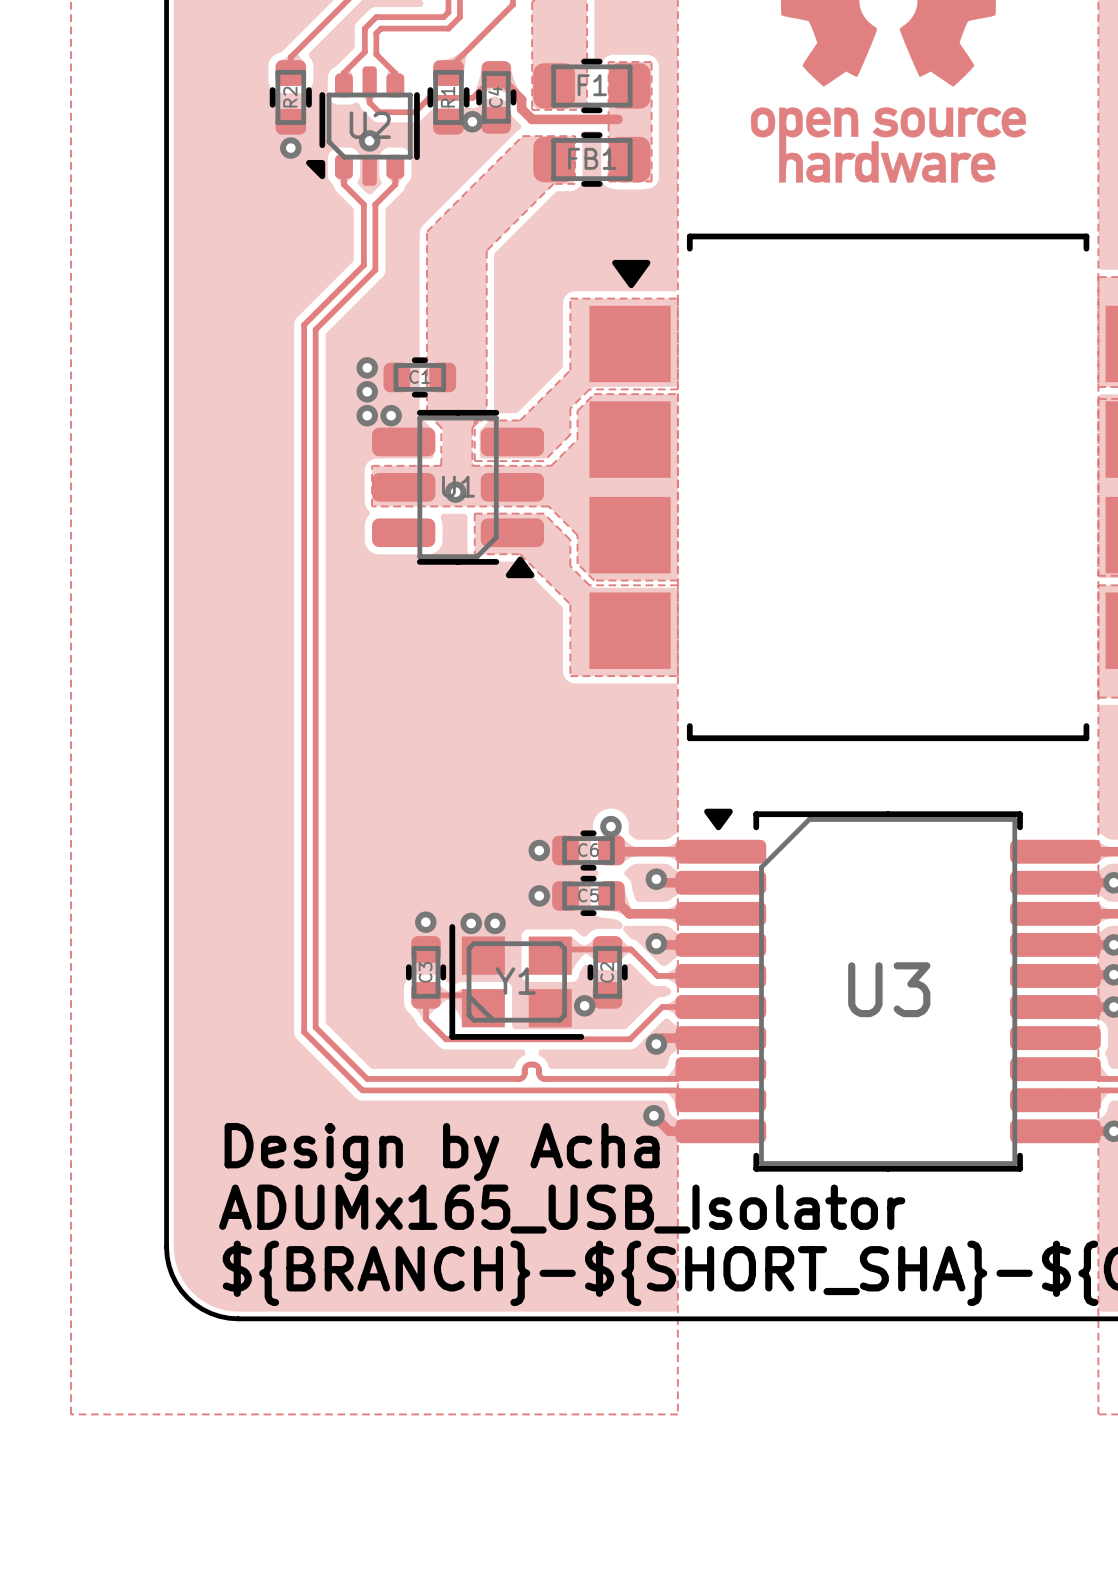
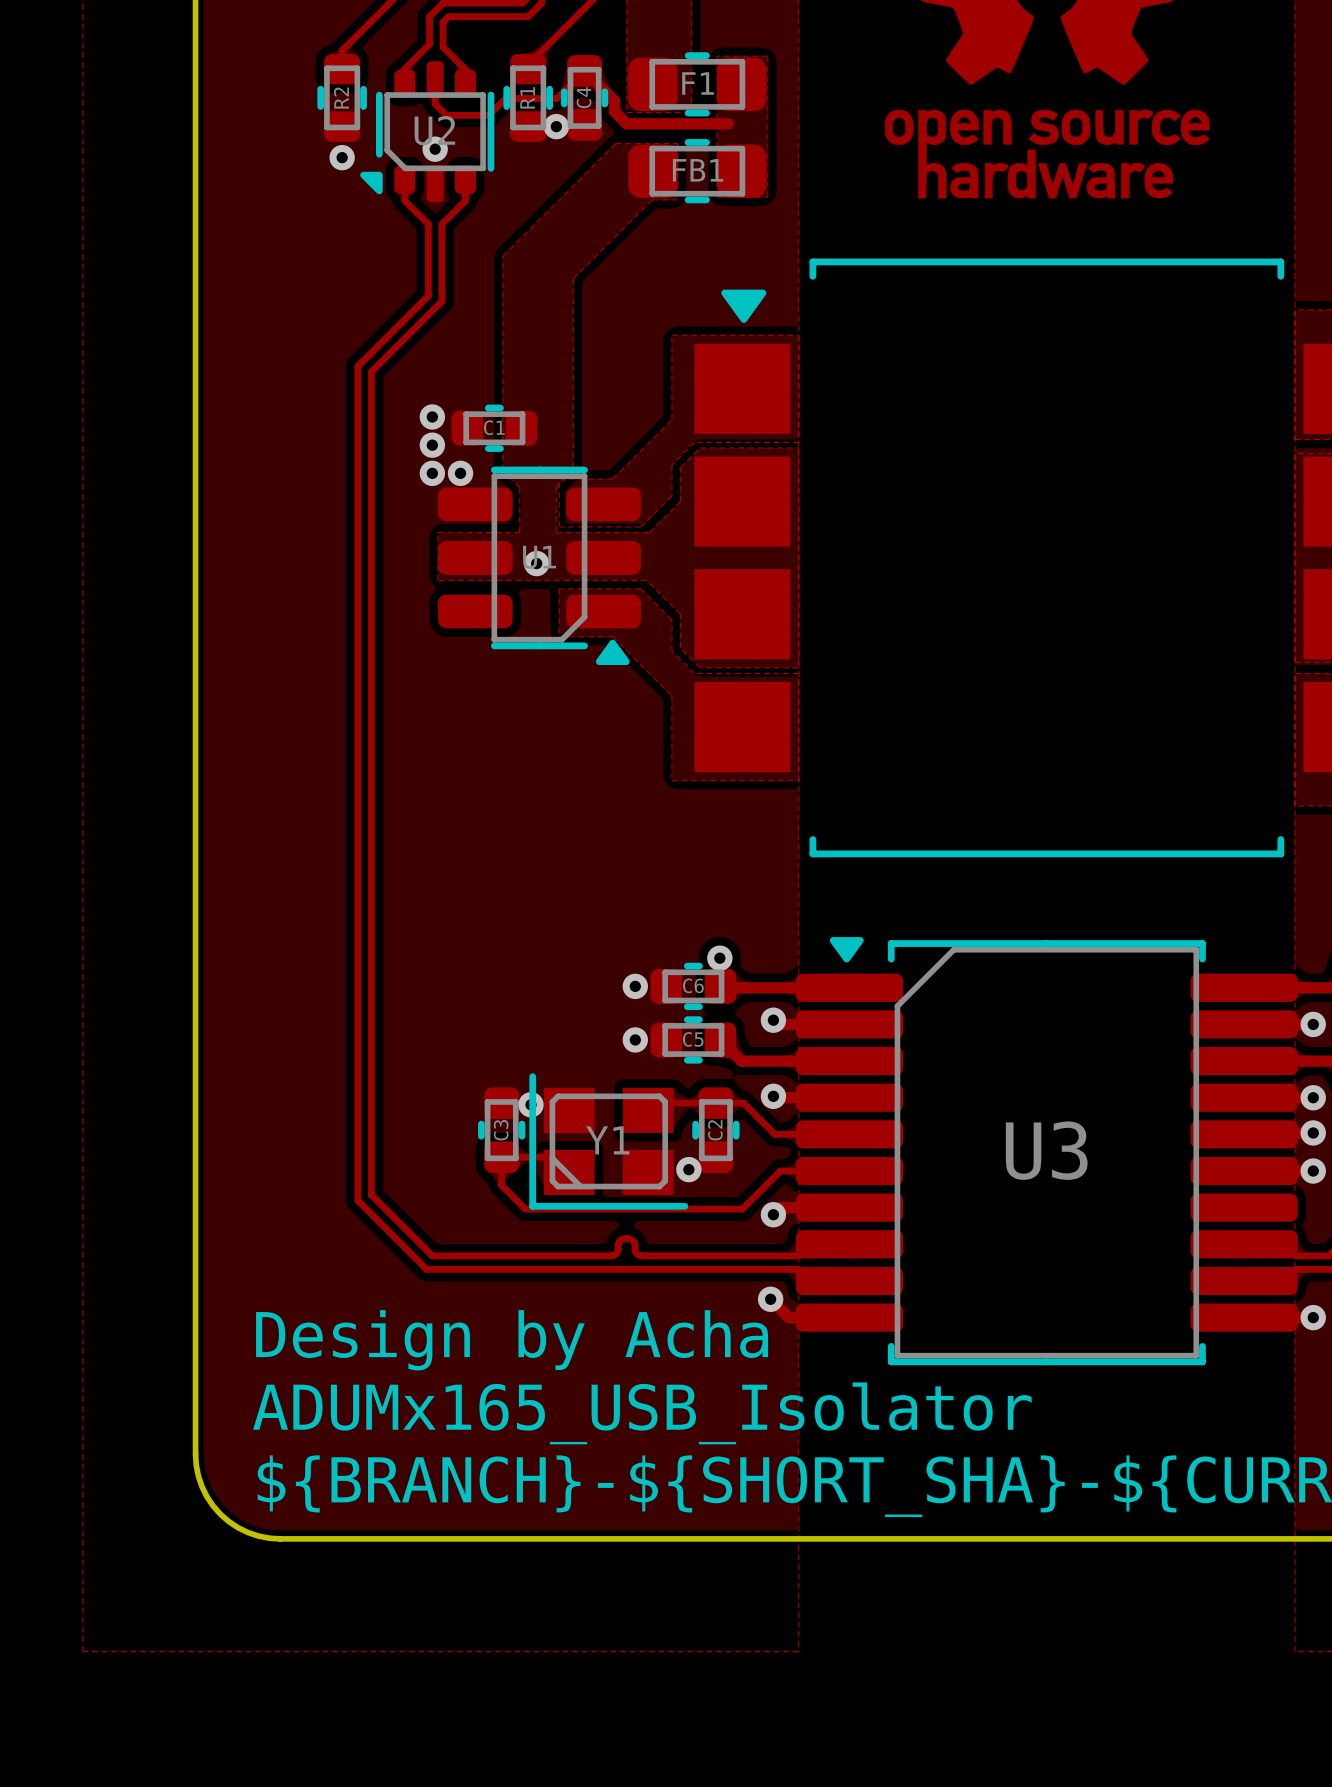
via: (425, 922) -> none
via: (471, 923) -> none
via: (495, 923) -> none
via: none -> (531, 1104)

